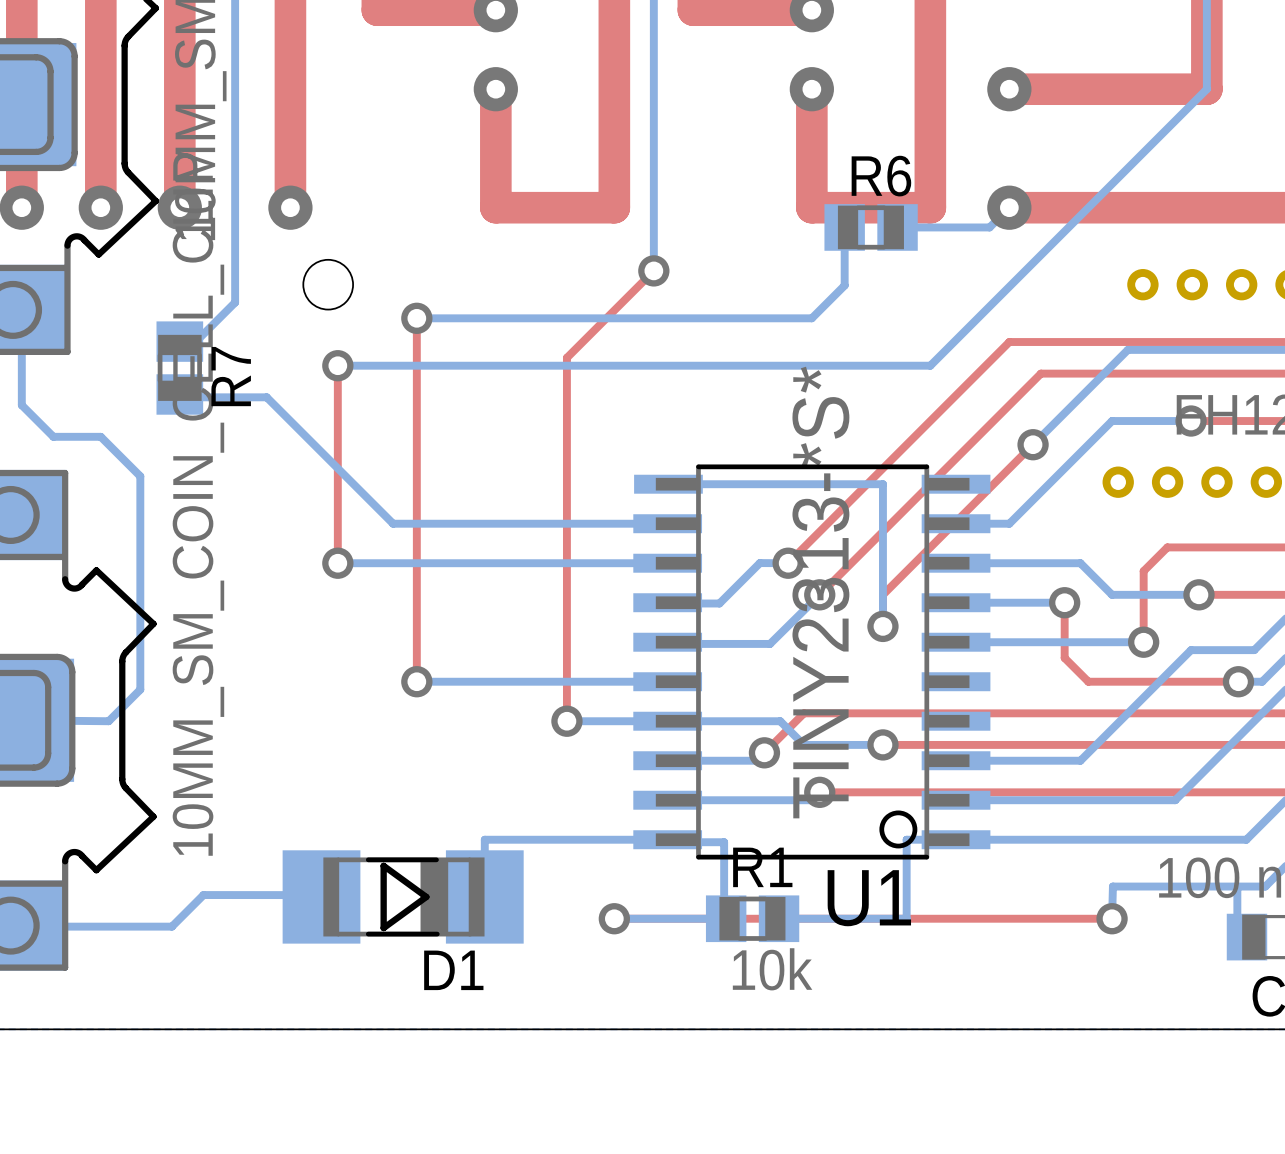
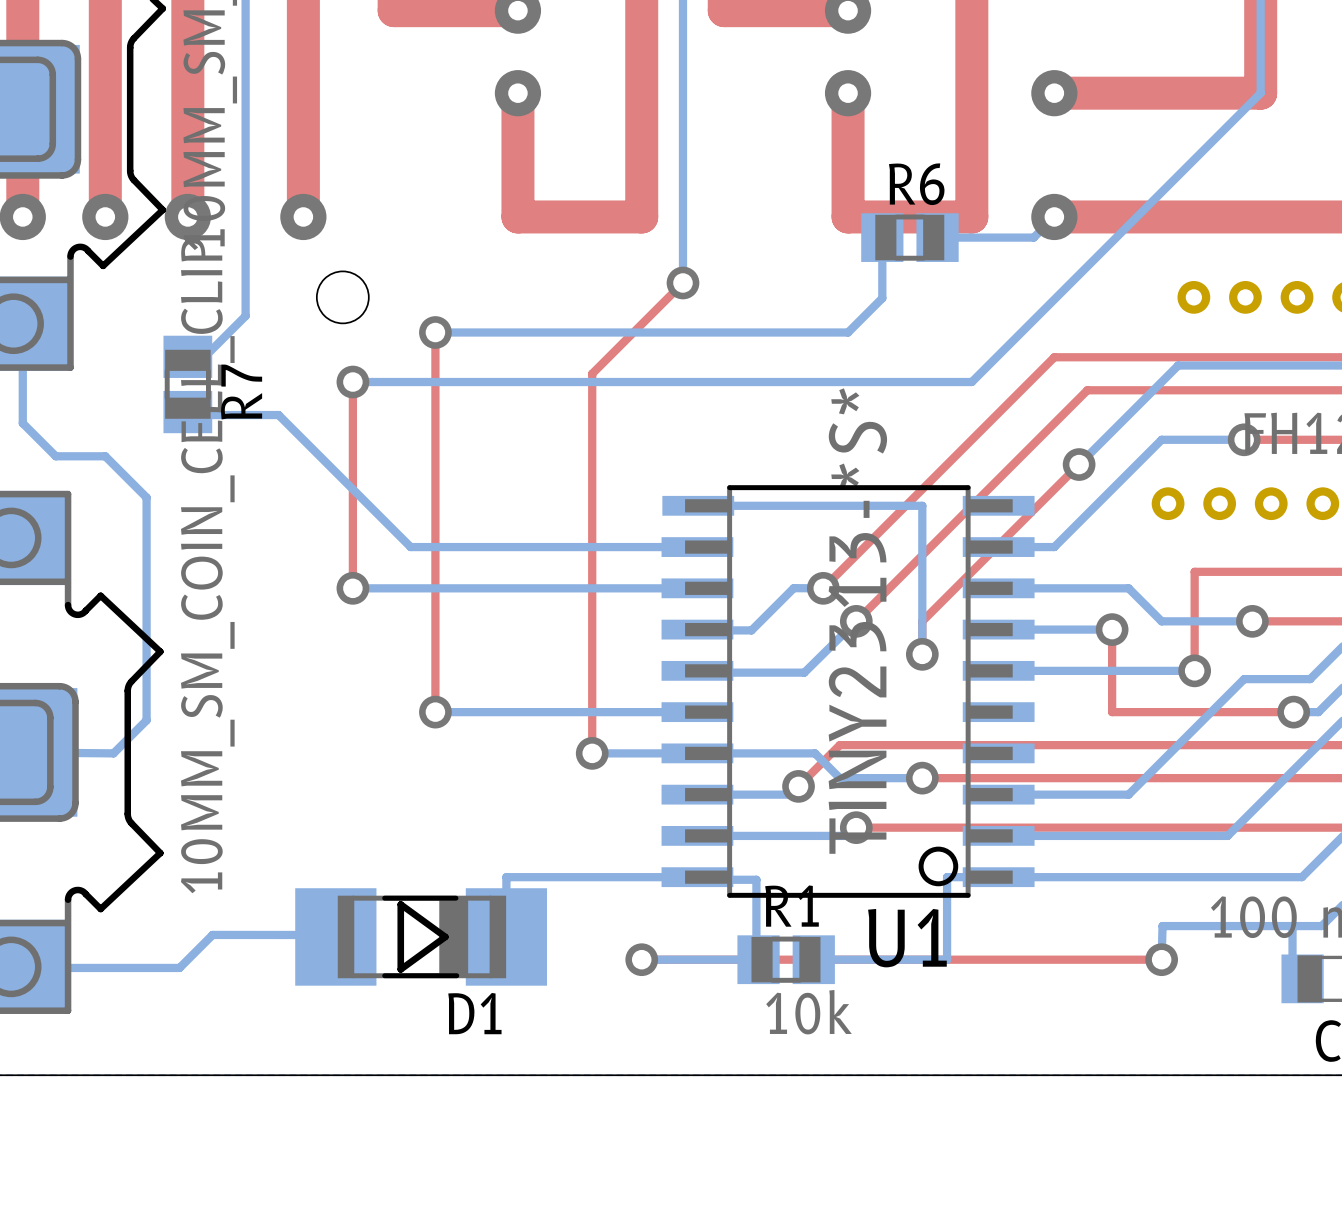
top track: (1167, 547) (1143, 571) -> (1219, 571) (1194, 571) (1194, 596)
top track: (1064, 658) (1088, 681) -> (1112, 687) (1112, 712) (1136, 712)

